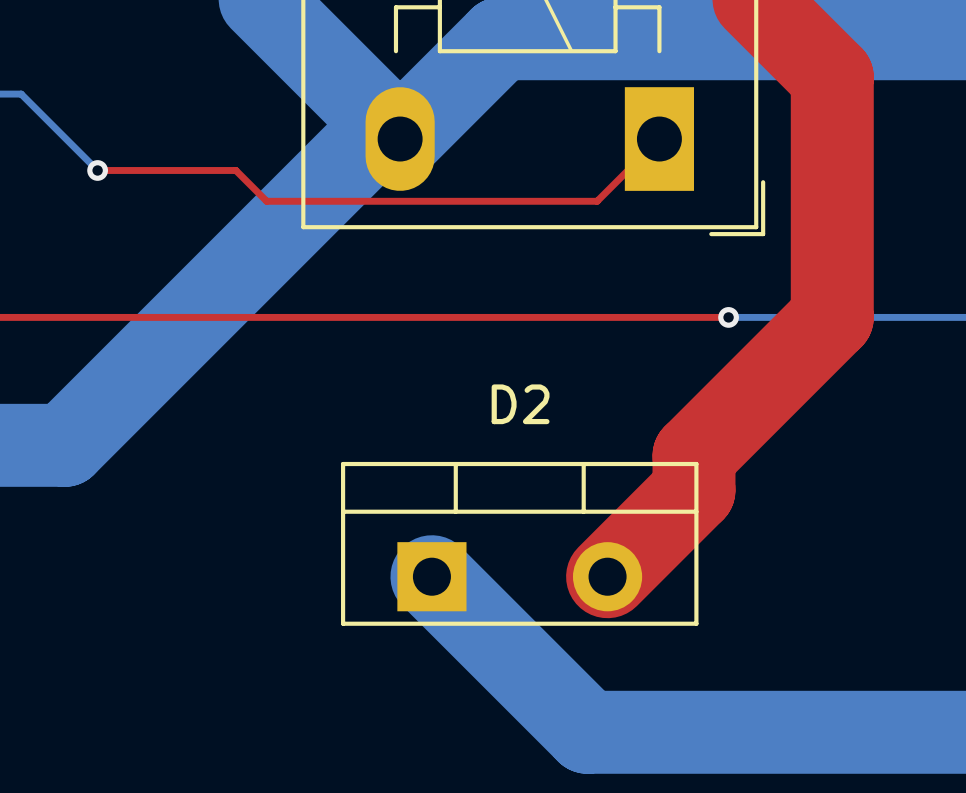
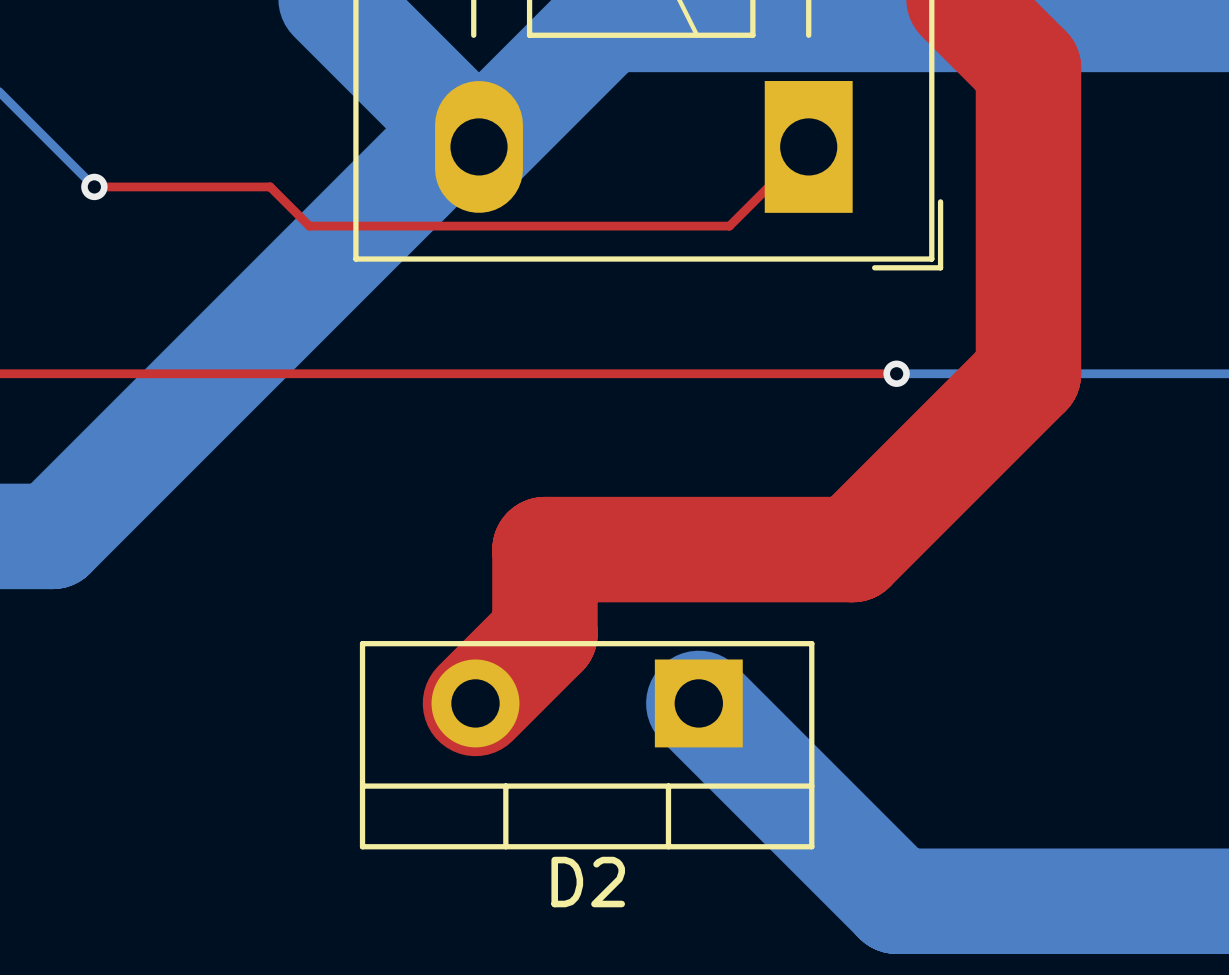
top track: (693, 455) (693, 490) (607, 576) -> (852, 549) (544, 549) (544, 633) (475, 703)
D2 rotation: 0° (519, 543) -> 180° (587, 745)
bottom track: (431, 576) (587, 732) (728, 732) -> (698, 703) (896, 901)

